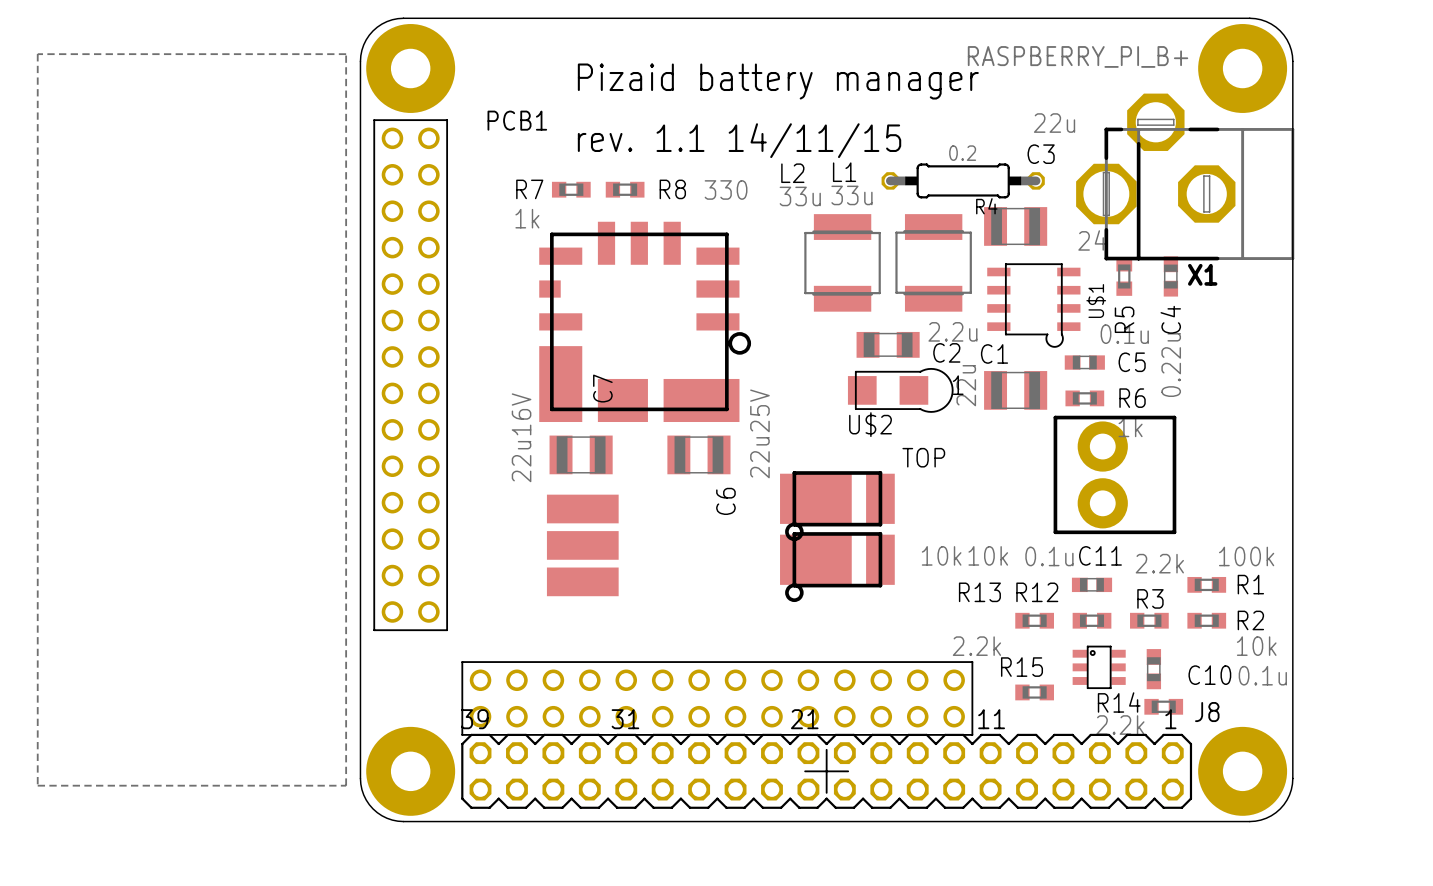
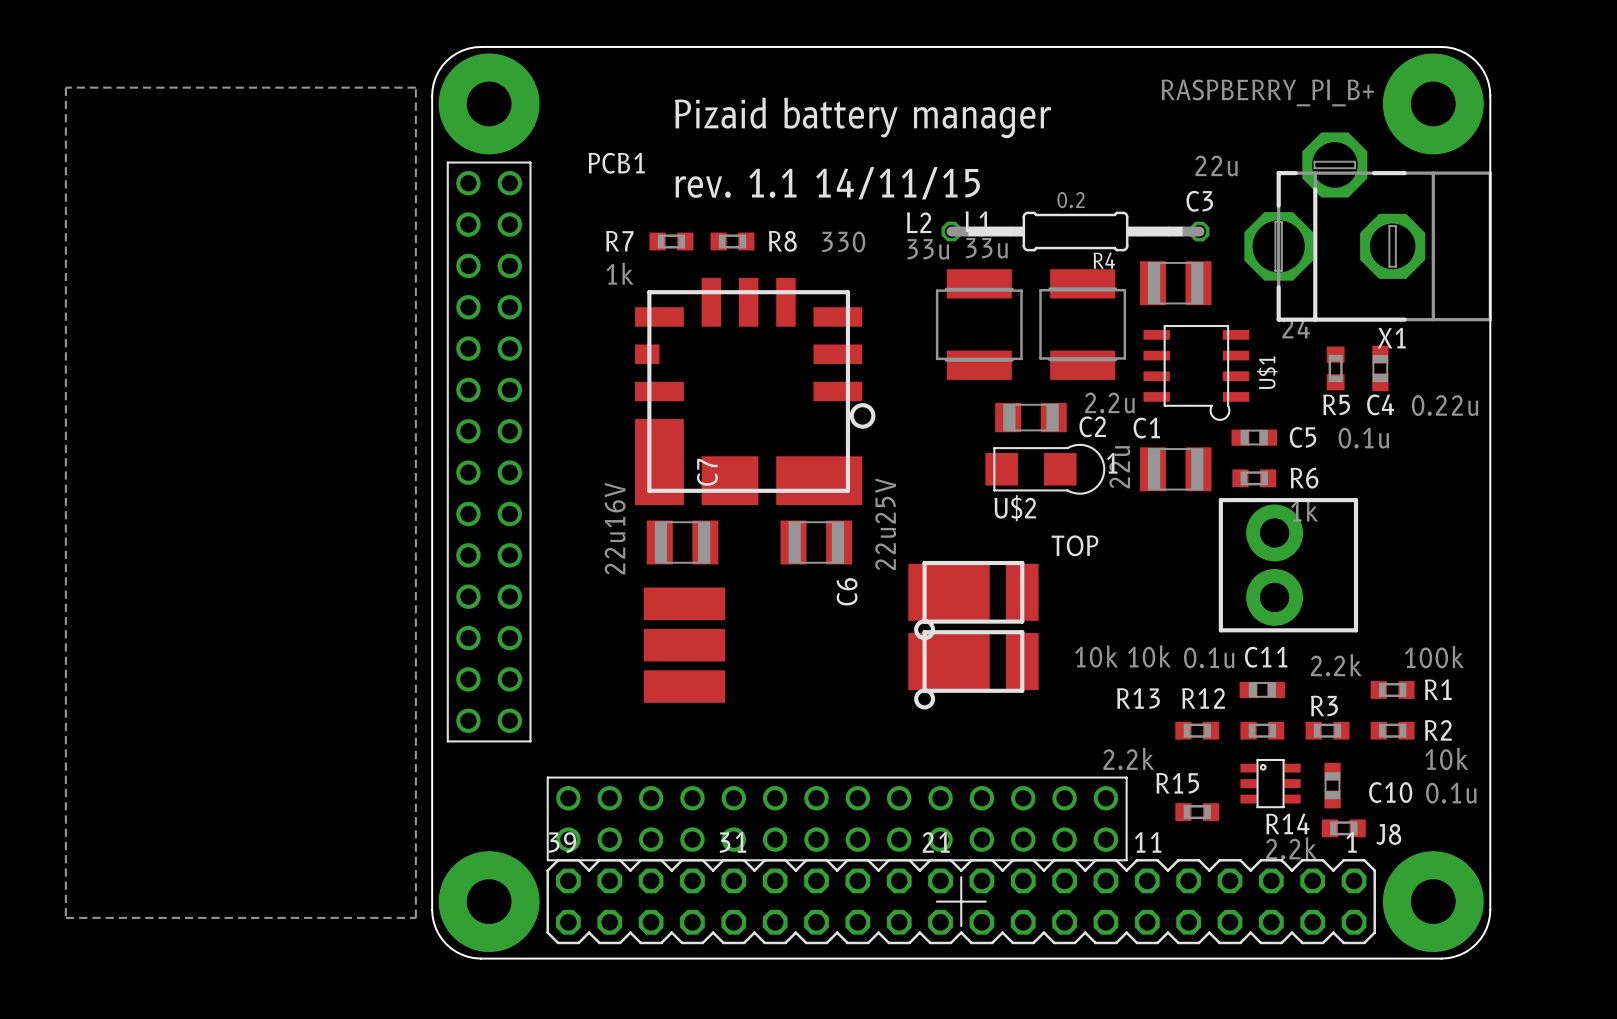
R4 footprint: [881, 163, 1045, 199] -> [941, 211, 1210, 252]
R5 position: (1124, 276) -> (1335, 368)
C4 position: (1170, 276) -> (1380, 368)
R5 name rotation: 0° (1124, 319) -> 90° clockwise (1336, 404)
C4 name rotation: 0° (1170, 319) -> 90° clockwise (1380, 404)
C5 value position: 0.1u (1124, 334) -> 0.1u (1363, 438)
C4 value rotation: 0° (1171, 365) -> 90° clockwise (1445, 405)

